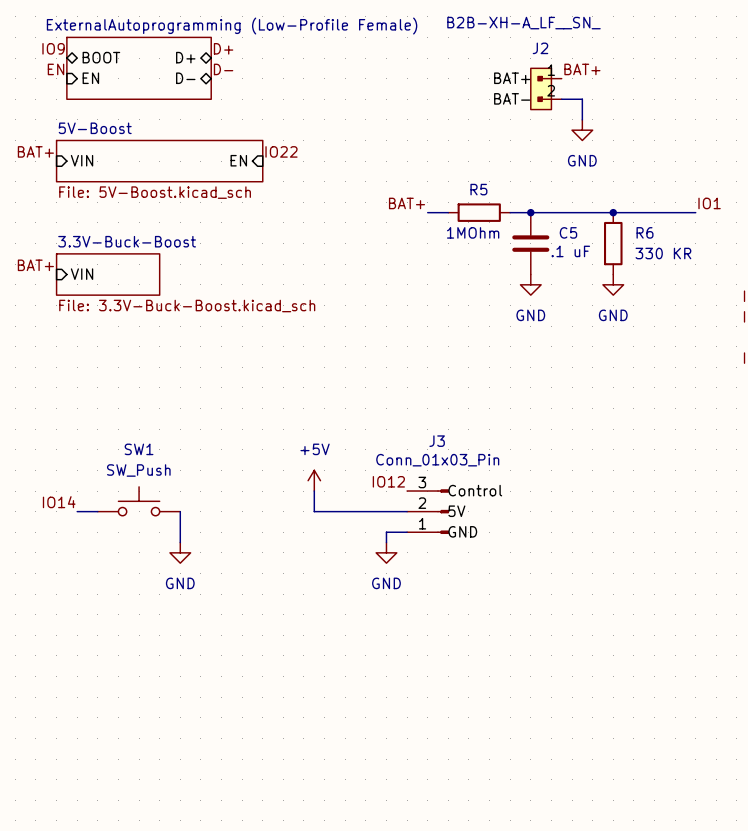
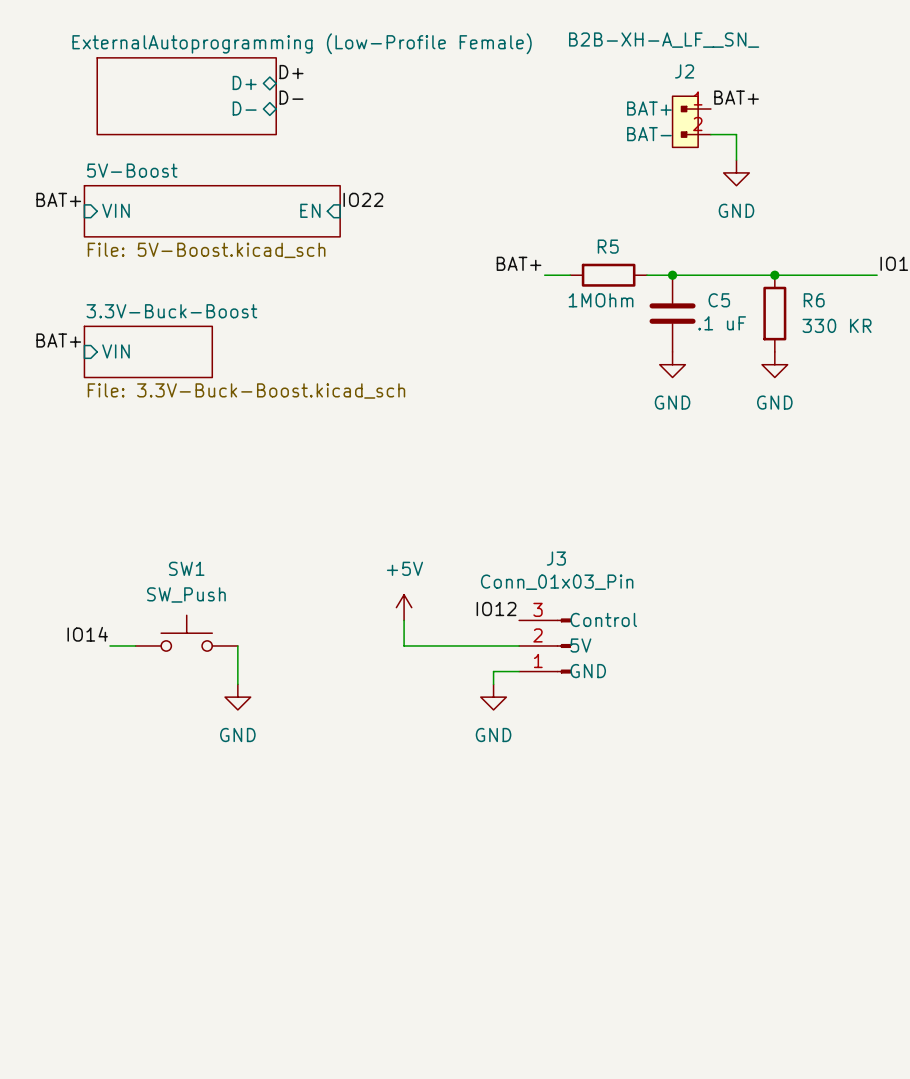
label: IO9 (53, 48) -> none
sheet pin: BOOT (101, 57) -> none
label: EN (56, 69) -> none
sheet pin: EN (90, 78) -> none

